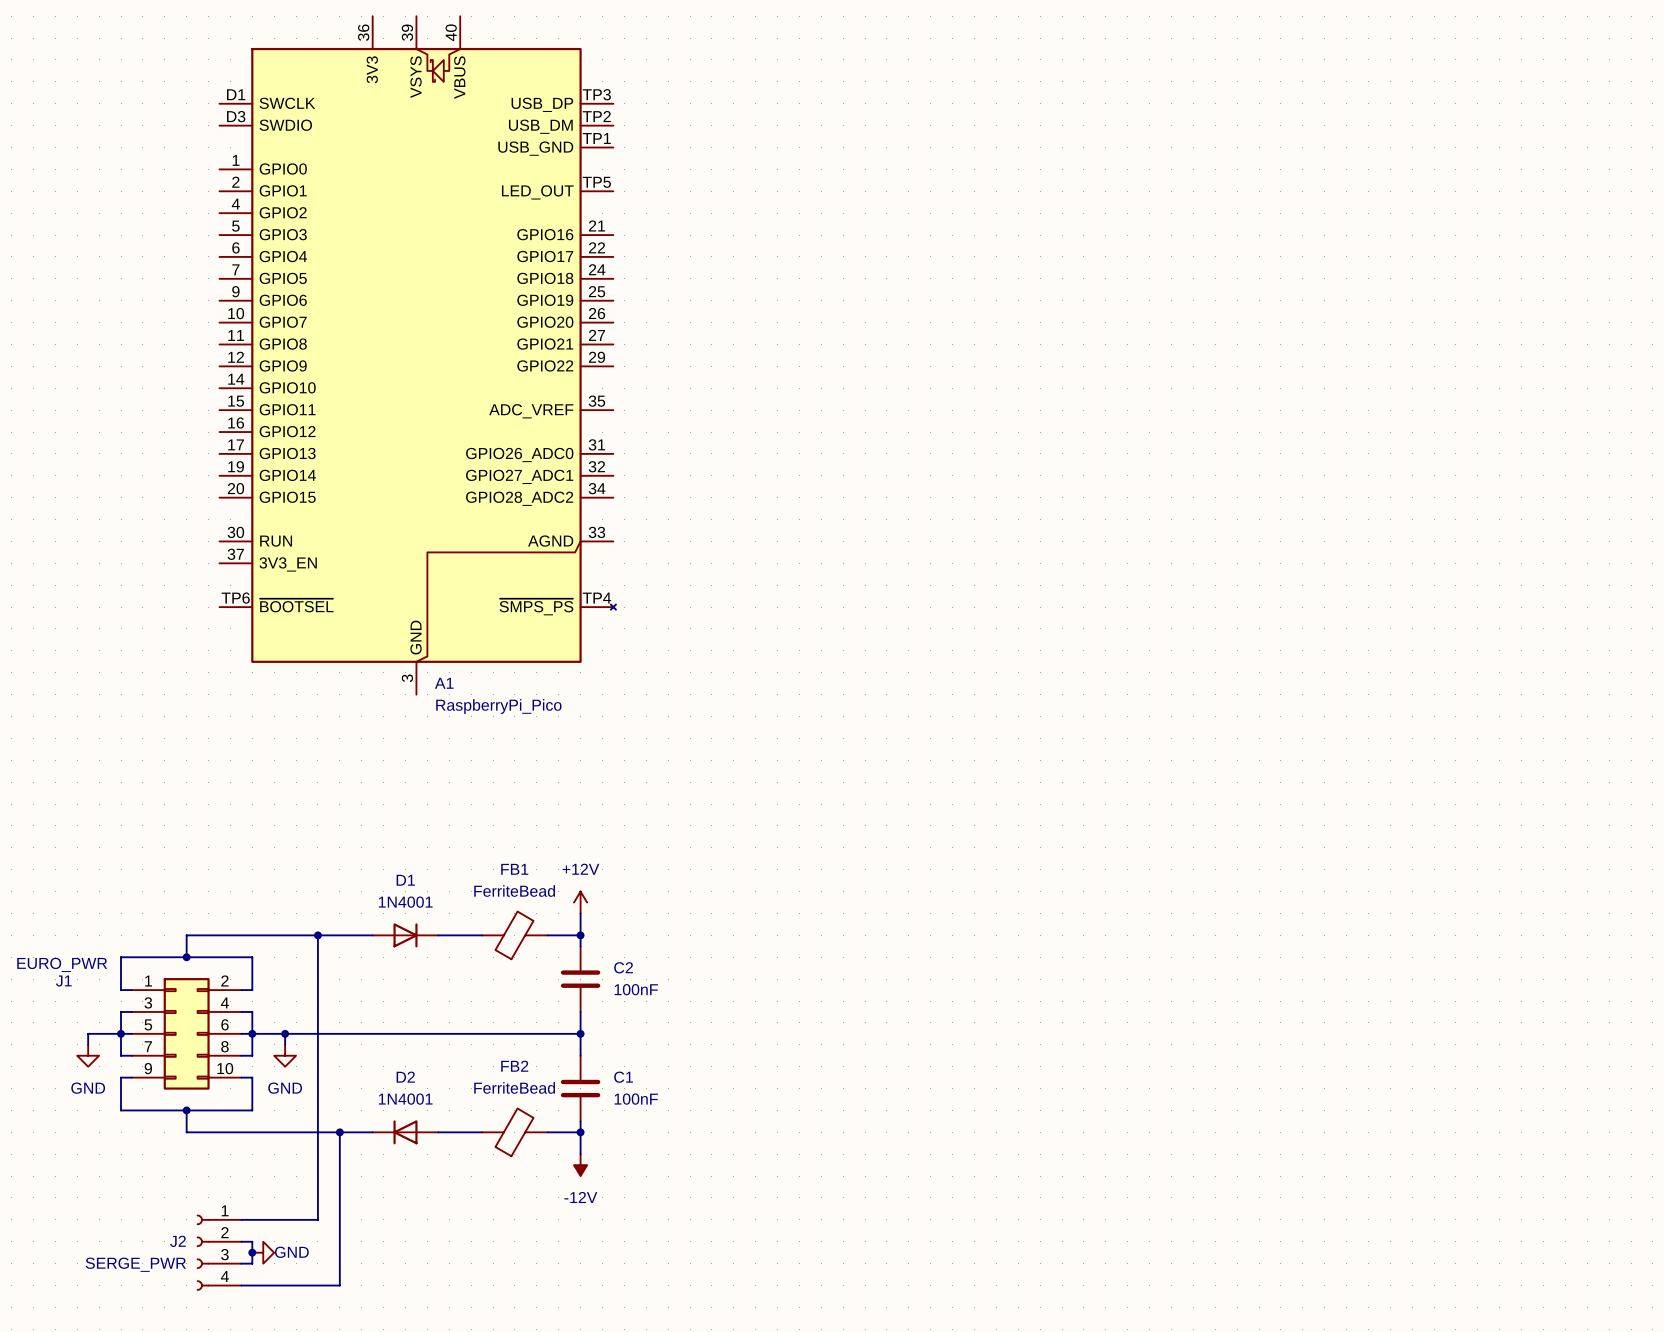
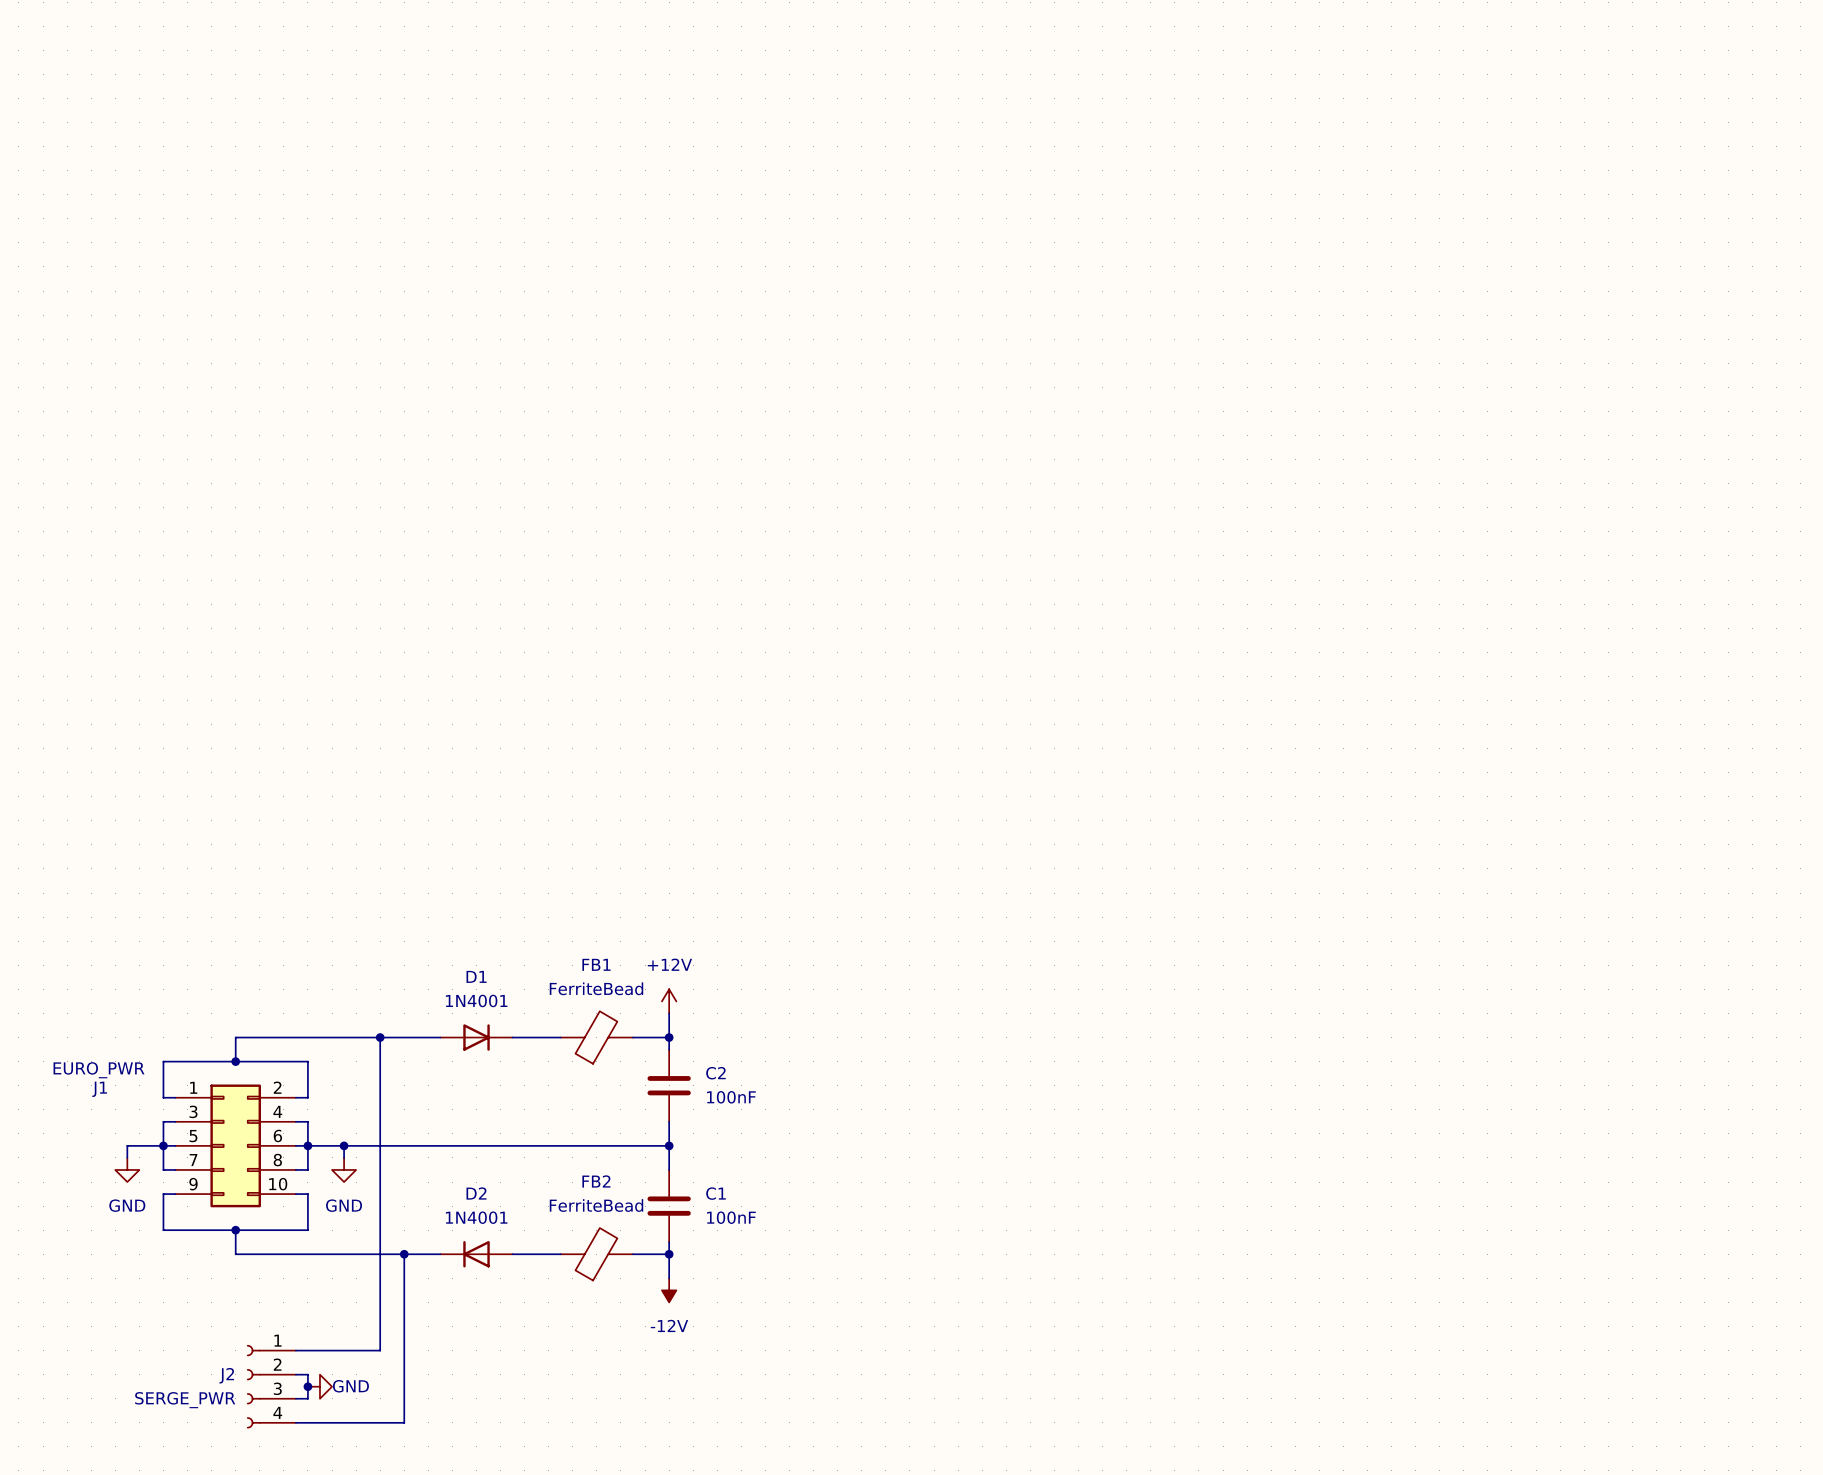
A1: RaspberryPi_Pico (417, 355) -> none

